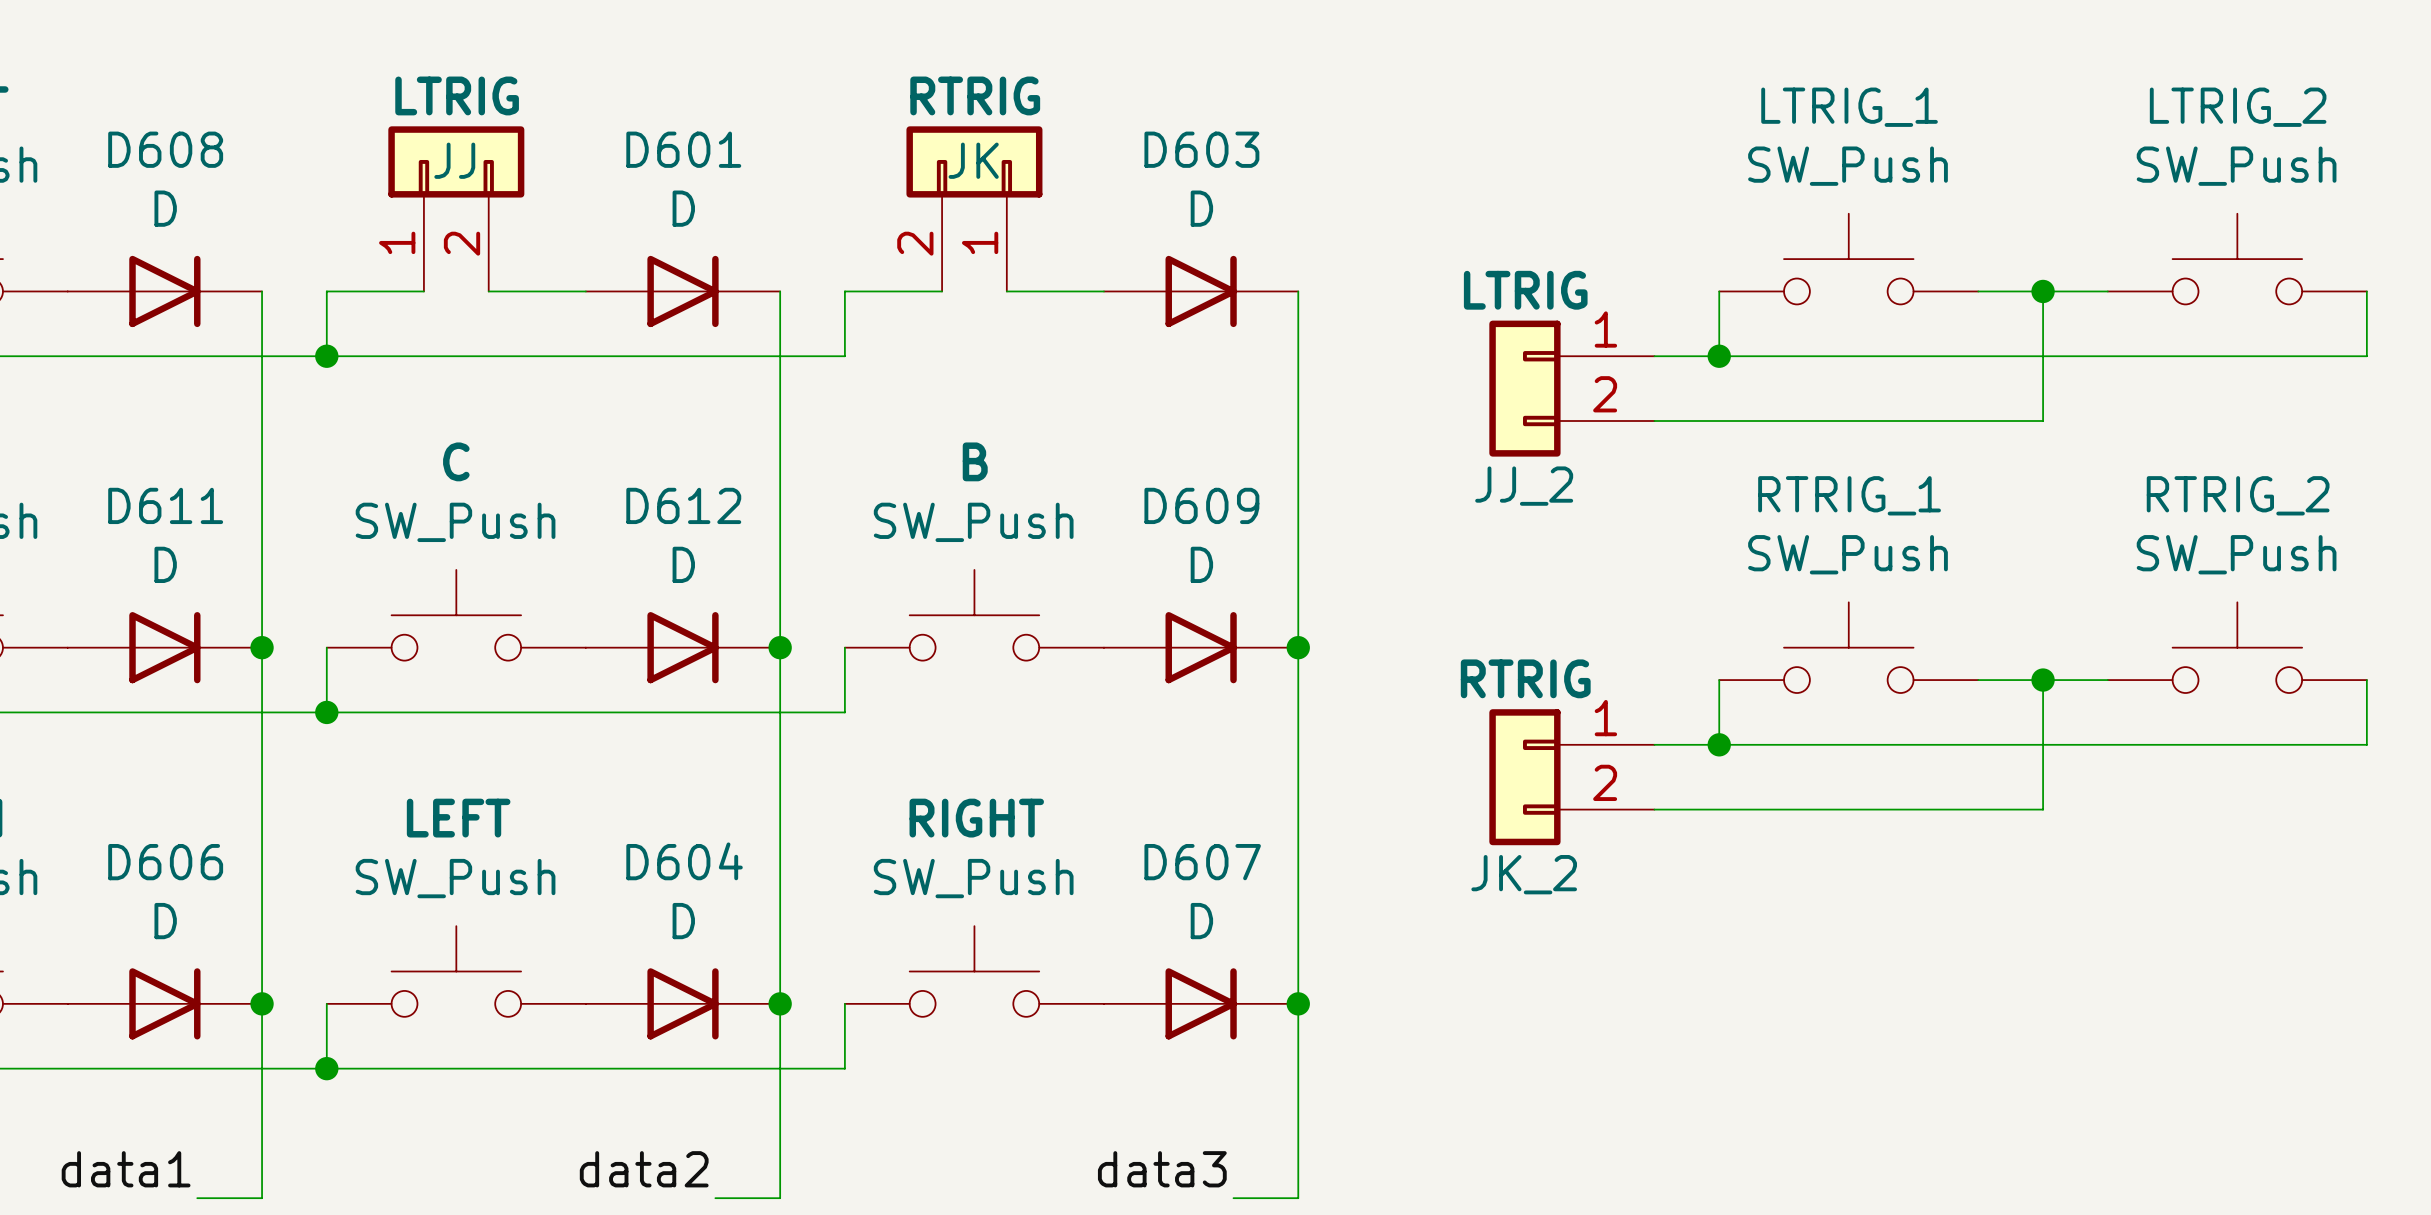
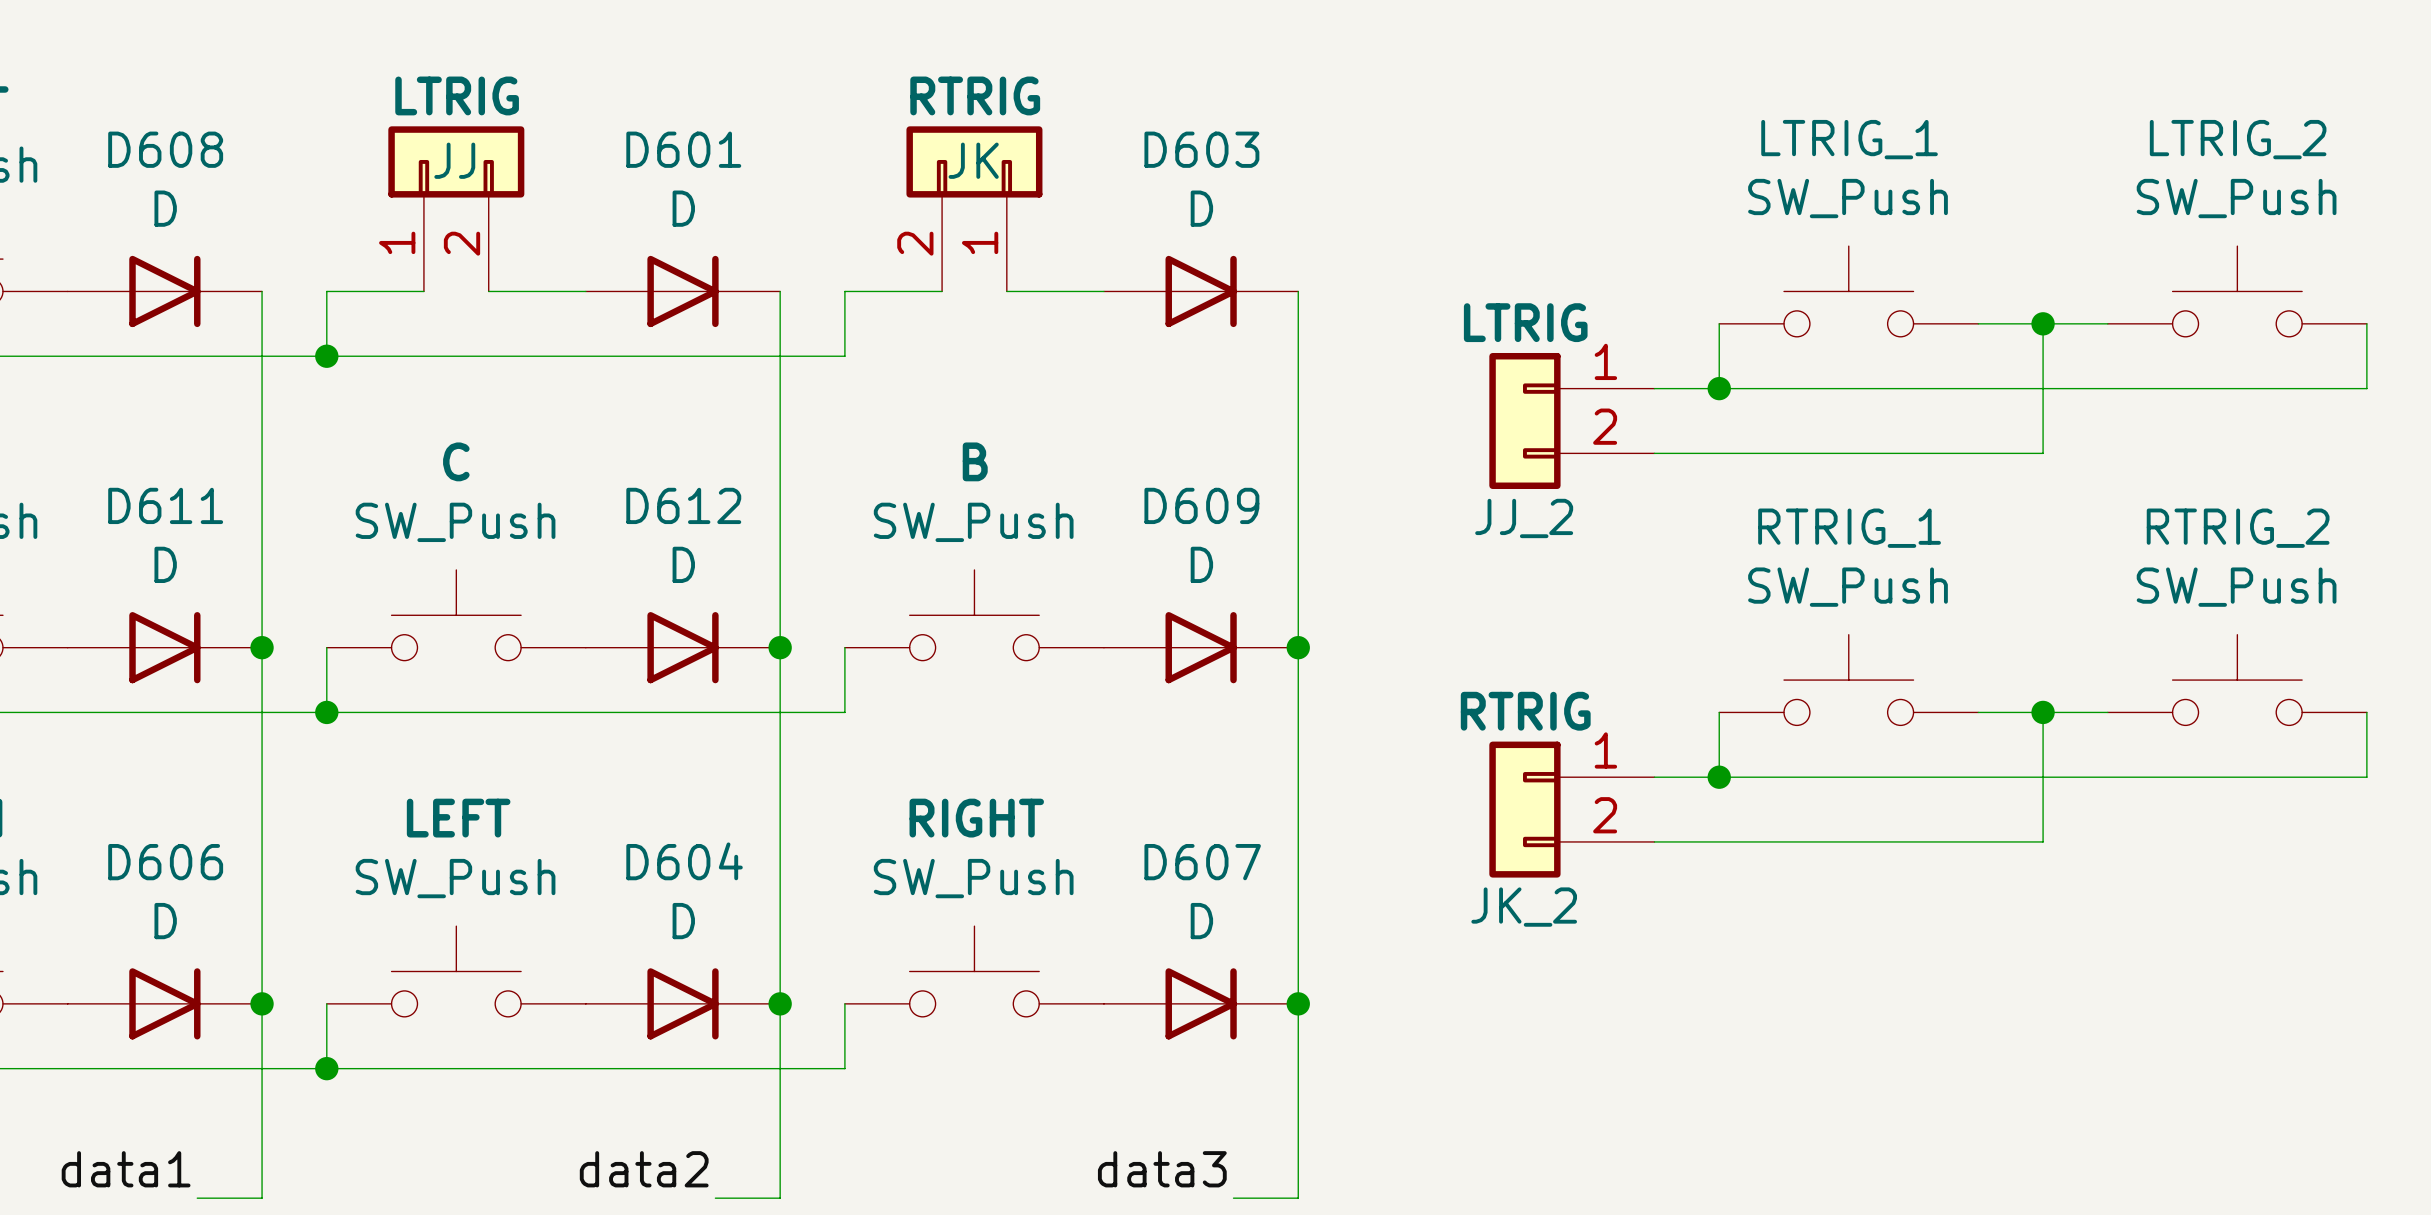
LTRIG_1 position: (1848, 259) -> (1848, 291)
LTRIG_2 position: (2237, 259) -> (2237, 291)
wire: (1719, 291) (1719, 323) -> (1719, 356) (1719, 388)
wire: (1978, 291) (2107, 291) -> (1978, 323) (2107, 323)
wire: (2043, 291) (2043, 323) -> none
junction position: (2043, 291) -> (2043, 323)
wire: (2366, 291) (2366, 323) -> none
wire: (1654, 356) (2366, 356) -> (1654, 388) (2366, 388) (2366, 356)
junction position: (1719, 356) -> (1719, 388)
JJ_2 position: (1571, 388) -> (1571, 420)
wire: (1654, 420) (2043, 420) -> (1654, 453) (2043, 453) (2043, 420)
RTRIG_1 position: (1848, 647) -> (1848, 680)
RTRIG_2 position: (2237, 647) -> (2237, 680)
wire: (1719, 680) (1719, 712) -> (1719, 744) (1719, 777)
wire: (1978, 680) (2107, 680) -> (1978, 712) (2107, 712)
wire: (2043, 680) (2043, 712) -> none
junction position: (2043, 680) -> (2043, 712)
wire: (2366, 680) (2366, 712) -> none
wire: (1654, 744) (2366, 744) -> (1654, 777) (2366, 777) (2366, 744)
junction position: (1719, 744) -> (1719, 777)
JK_2 position: (1571, 777) -> (1571, 809)
wire: (1654, 809) (2043, 809) -> (1654, 841) (2043, 841) (2043, 809)

